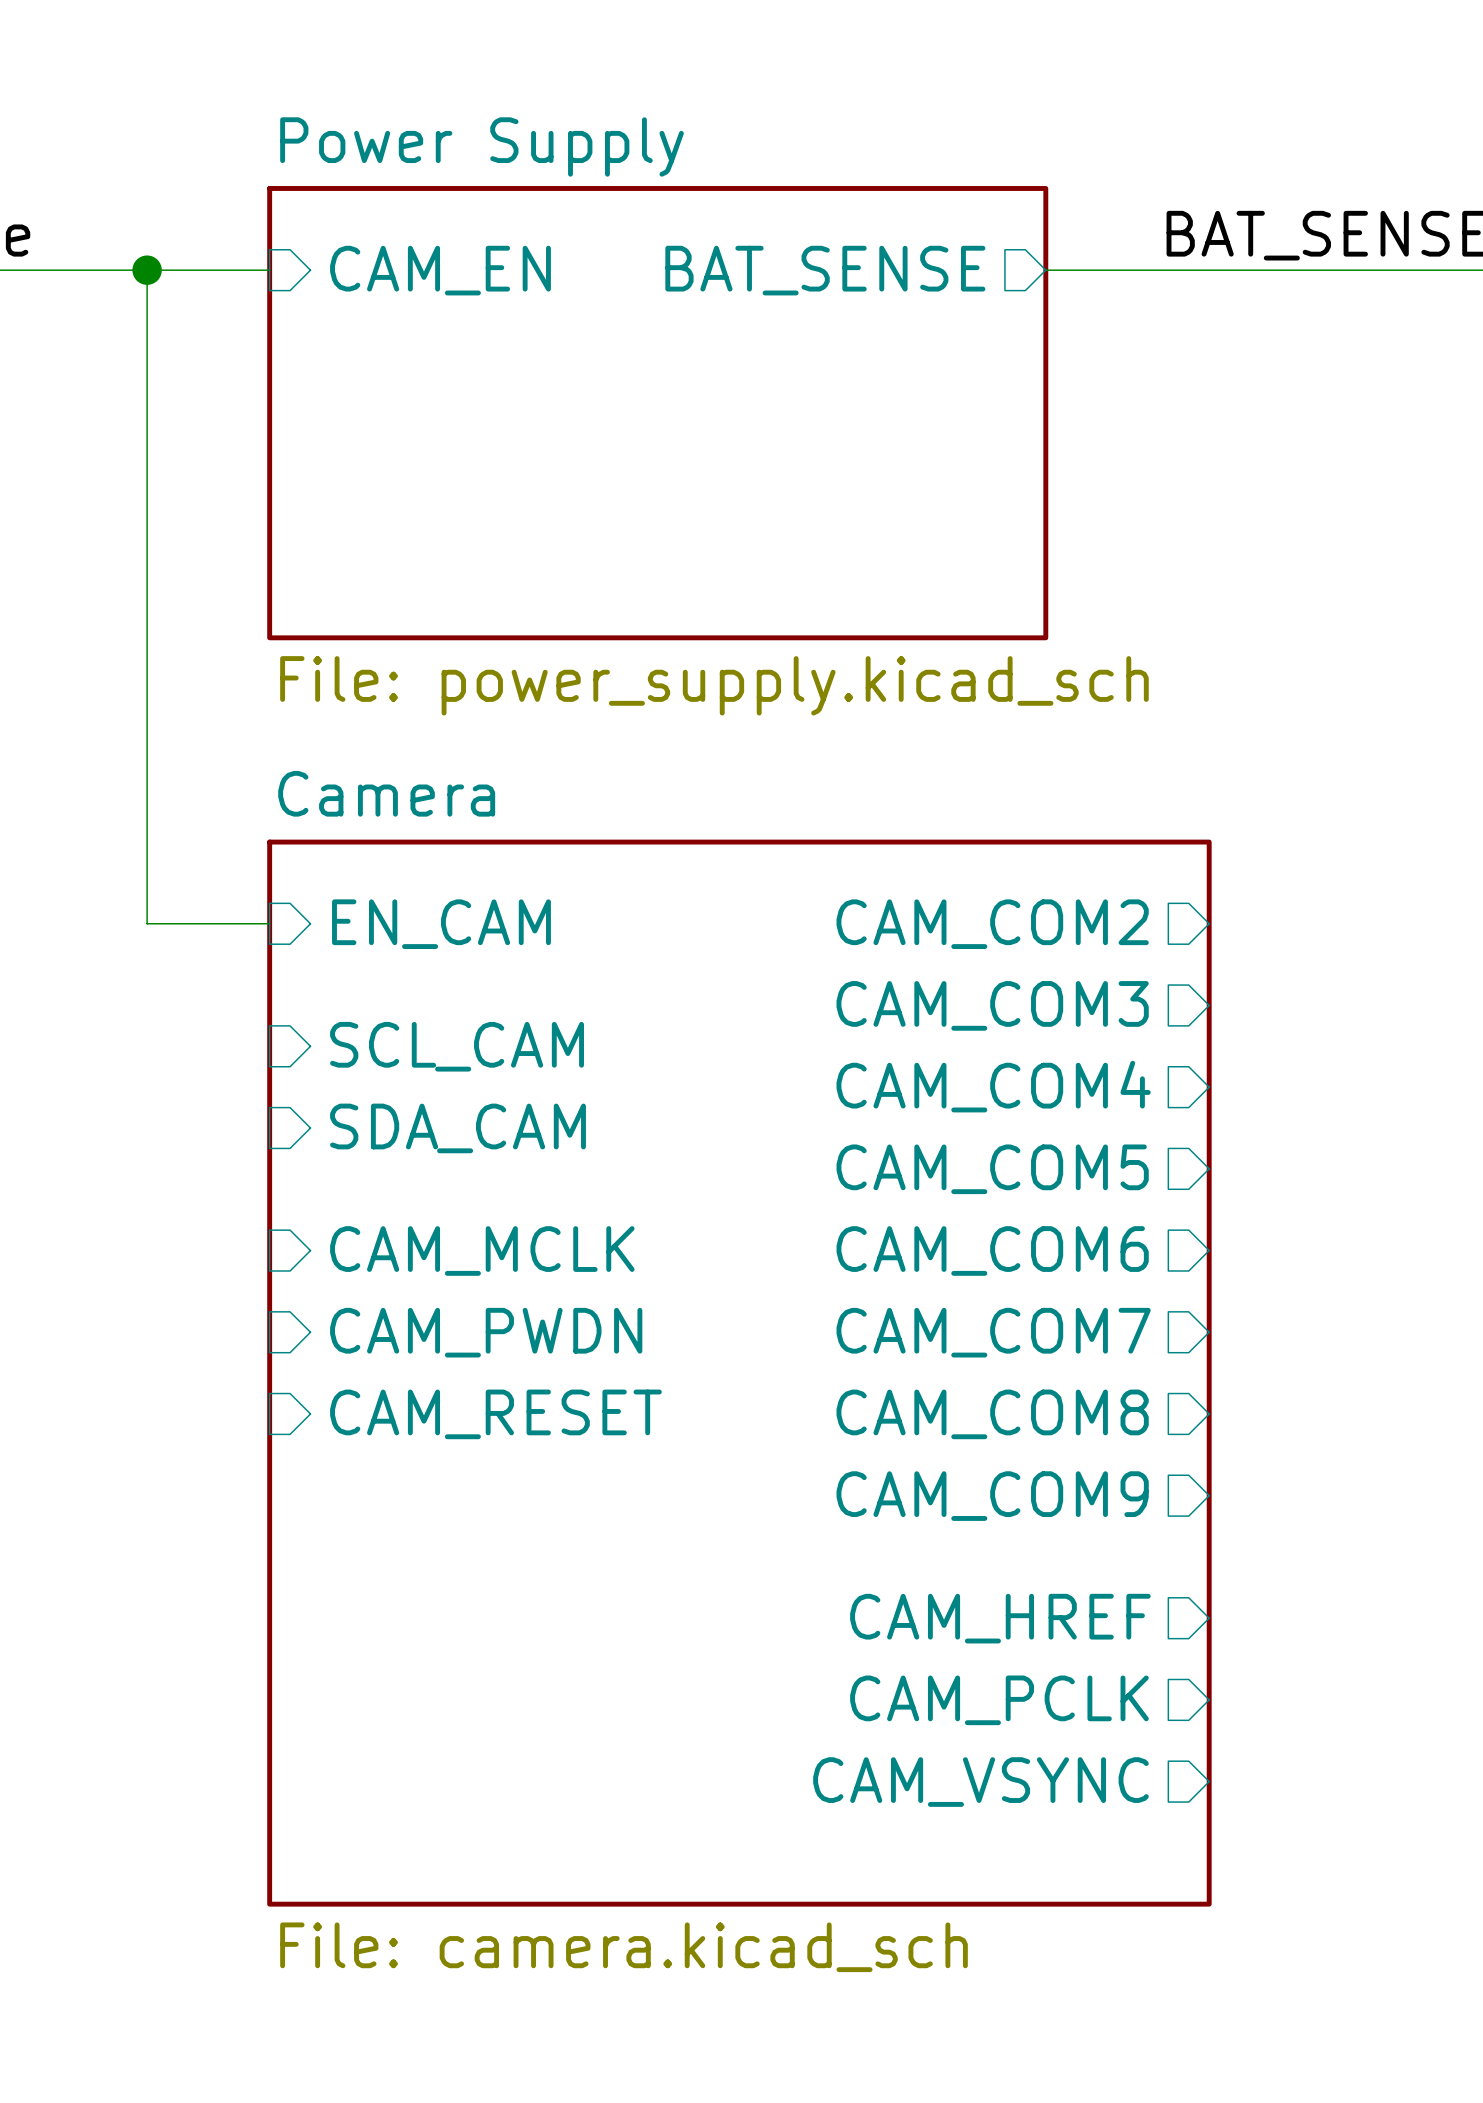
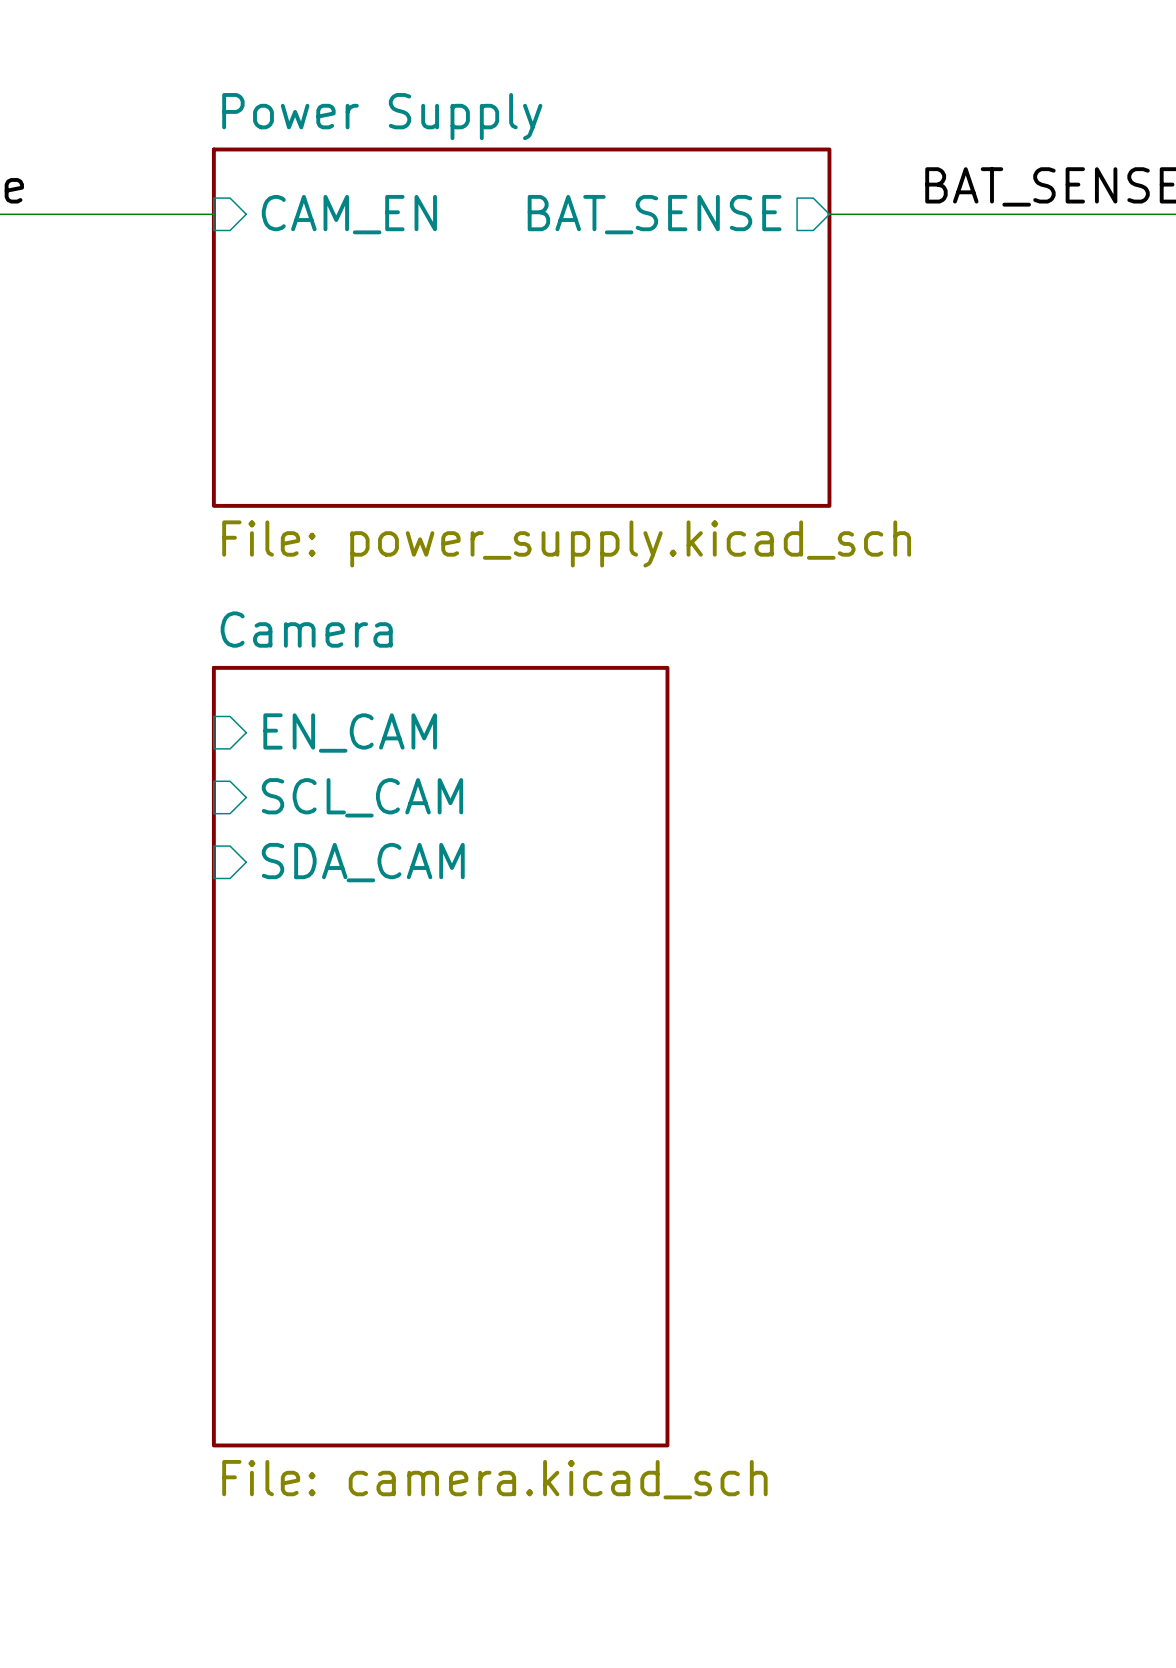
wire: (147, 270) (147, 923) (269, 923) -> none
junction: (147, 270) -> none
sheet pin: CAM_COM2 (992, 924) -> none
sheet pin: CAM_COM3 (992, 1005) -> none
sheet pin position: SCL_CAM (457, 1046) -> SCL_CAM (362, 797)
sheet pin: CAM_COM4 (993, 1086) -> none
sheet pin position: SDA_CAM (458, 1128) -> SDA_CAM (363, 862)
sheet pin: CAM_COM5 (992, 1169) -> none
sheet pin: CAM_MCLK (482, 1250) -> none
sheet pin: CAM_COM6 (992, 1250) -> none
sheet pin: CAM_PWDN (486, 1332) -> none
sheet Camera: none -> File: camera.kicad_sch (440, 1056)
sheet pin: CAM_COM7 (993, 1332) -> none
sheet Camera: File: camera.kicad_sch (739, 1373) -> none
sheet pin: CAM_RESET (495, 1414) -> none
sheet pin: CAM_COM8 (992, 1414) -> none
sheet pin: CAM_COM9 (992, 1496) -> none
sheet pin: CAM_HREF (1000, 1618) -> none
sheet pin: CAM_PCLK (999, 1700) -> none
sheet pin: CAM_VSYNC (980, 1782) -> none

